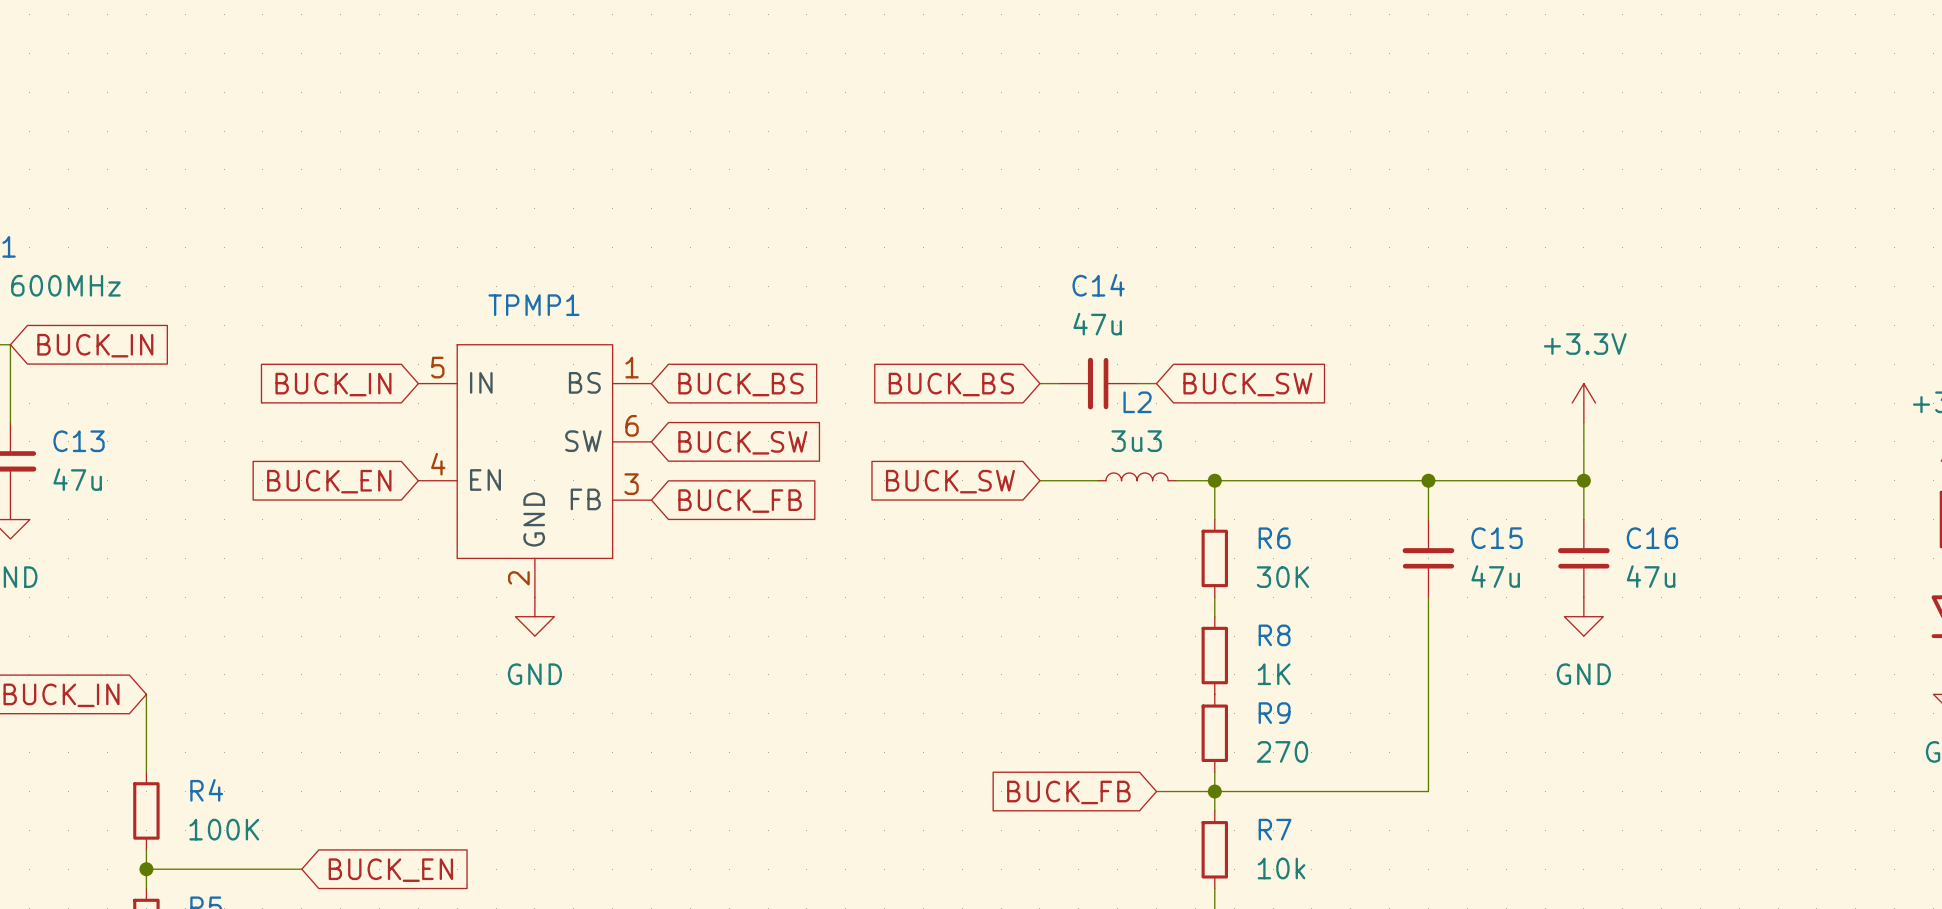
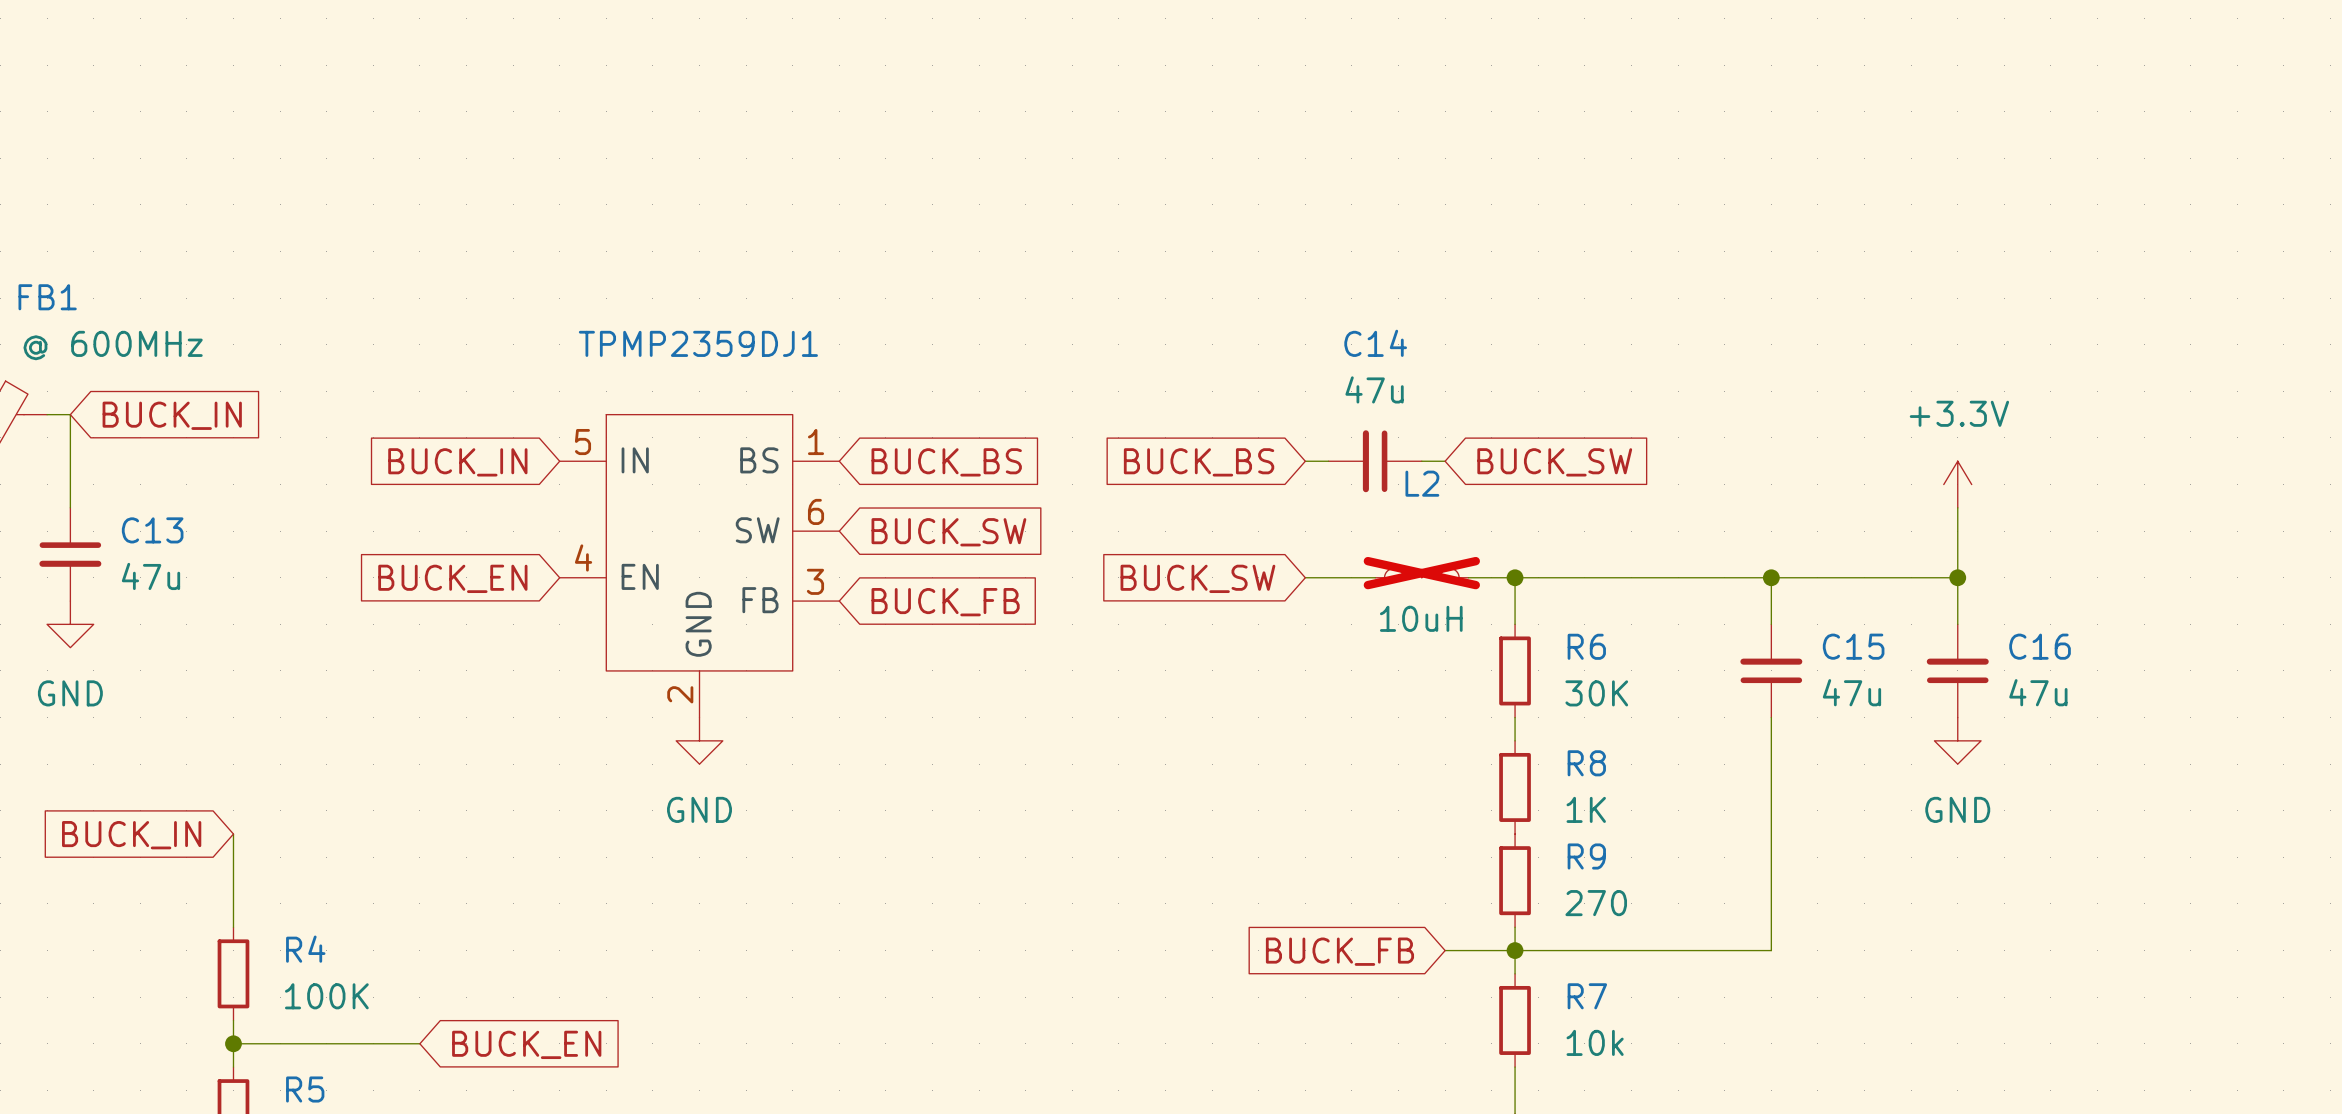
TPMP1 name: TPMP1 (533, 305) -> TPMP2359DJ1 (698, 343)
L2 value: 3u3 (1136, 441) -> 10uH (1421, 618)
L2 do-not-place cross: none -> (1421, 573)

